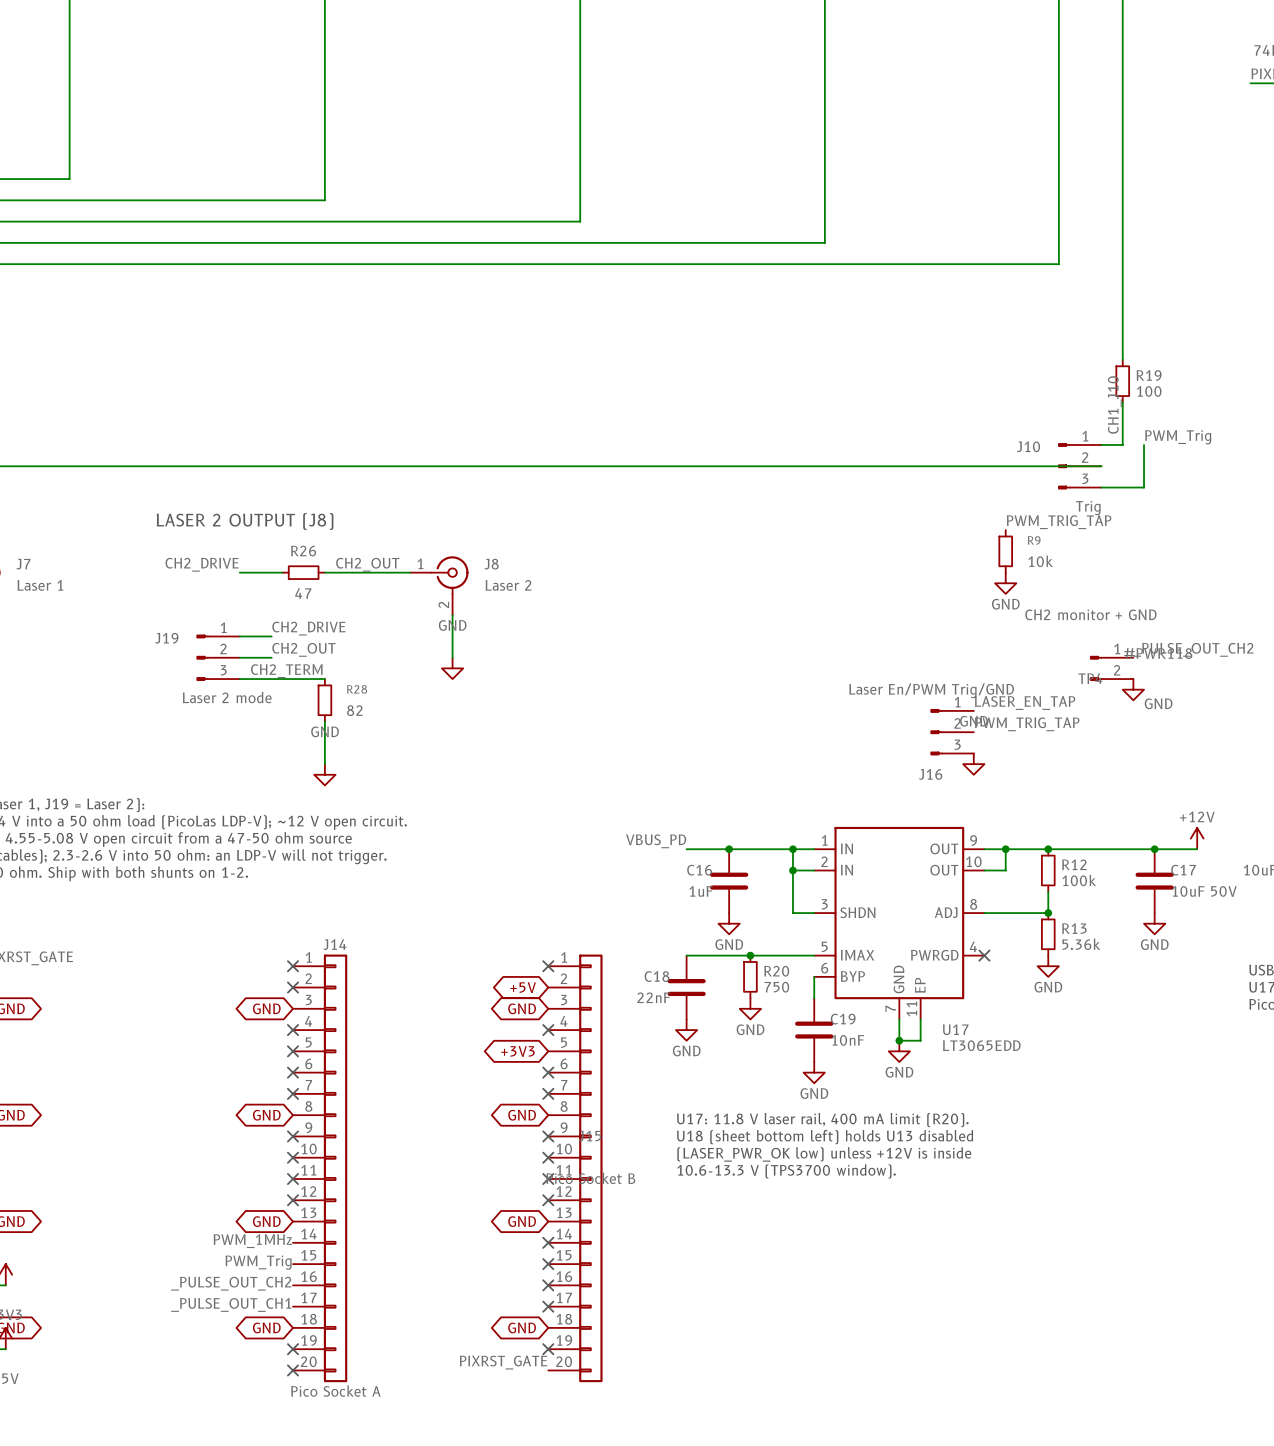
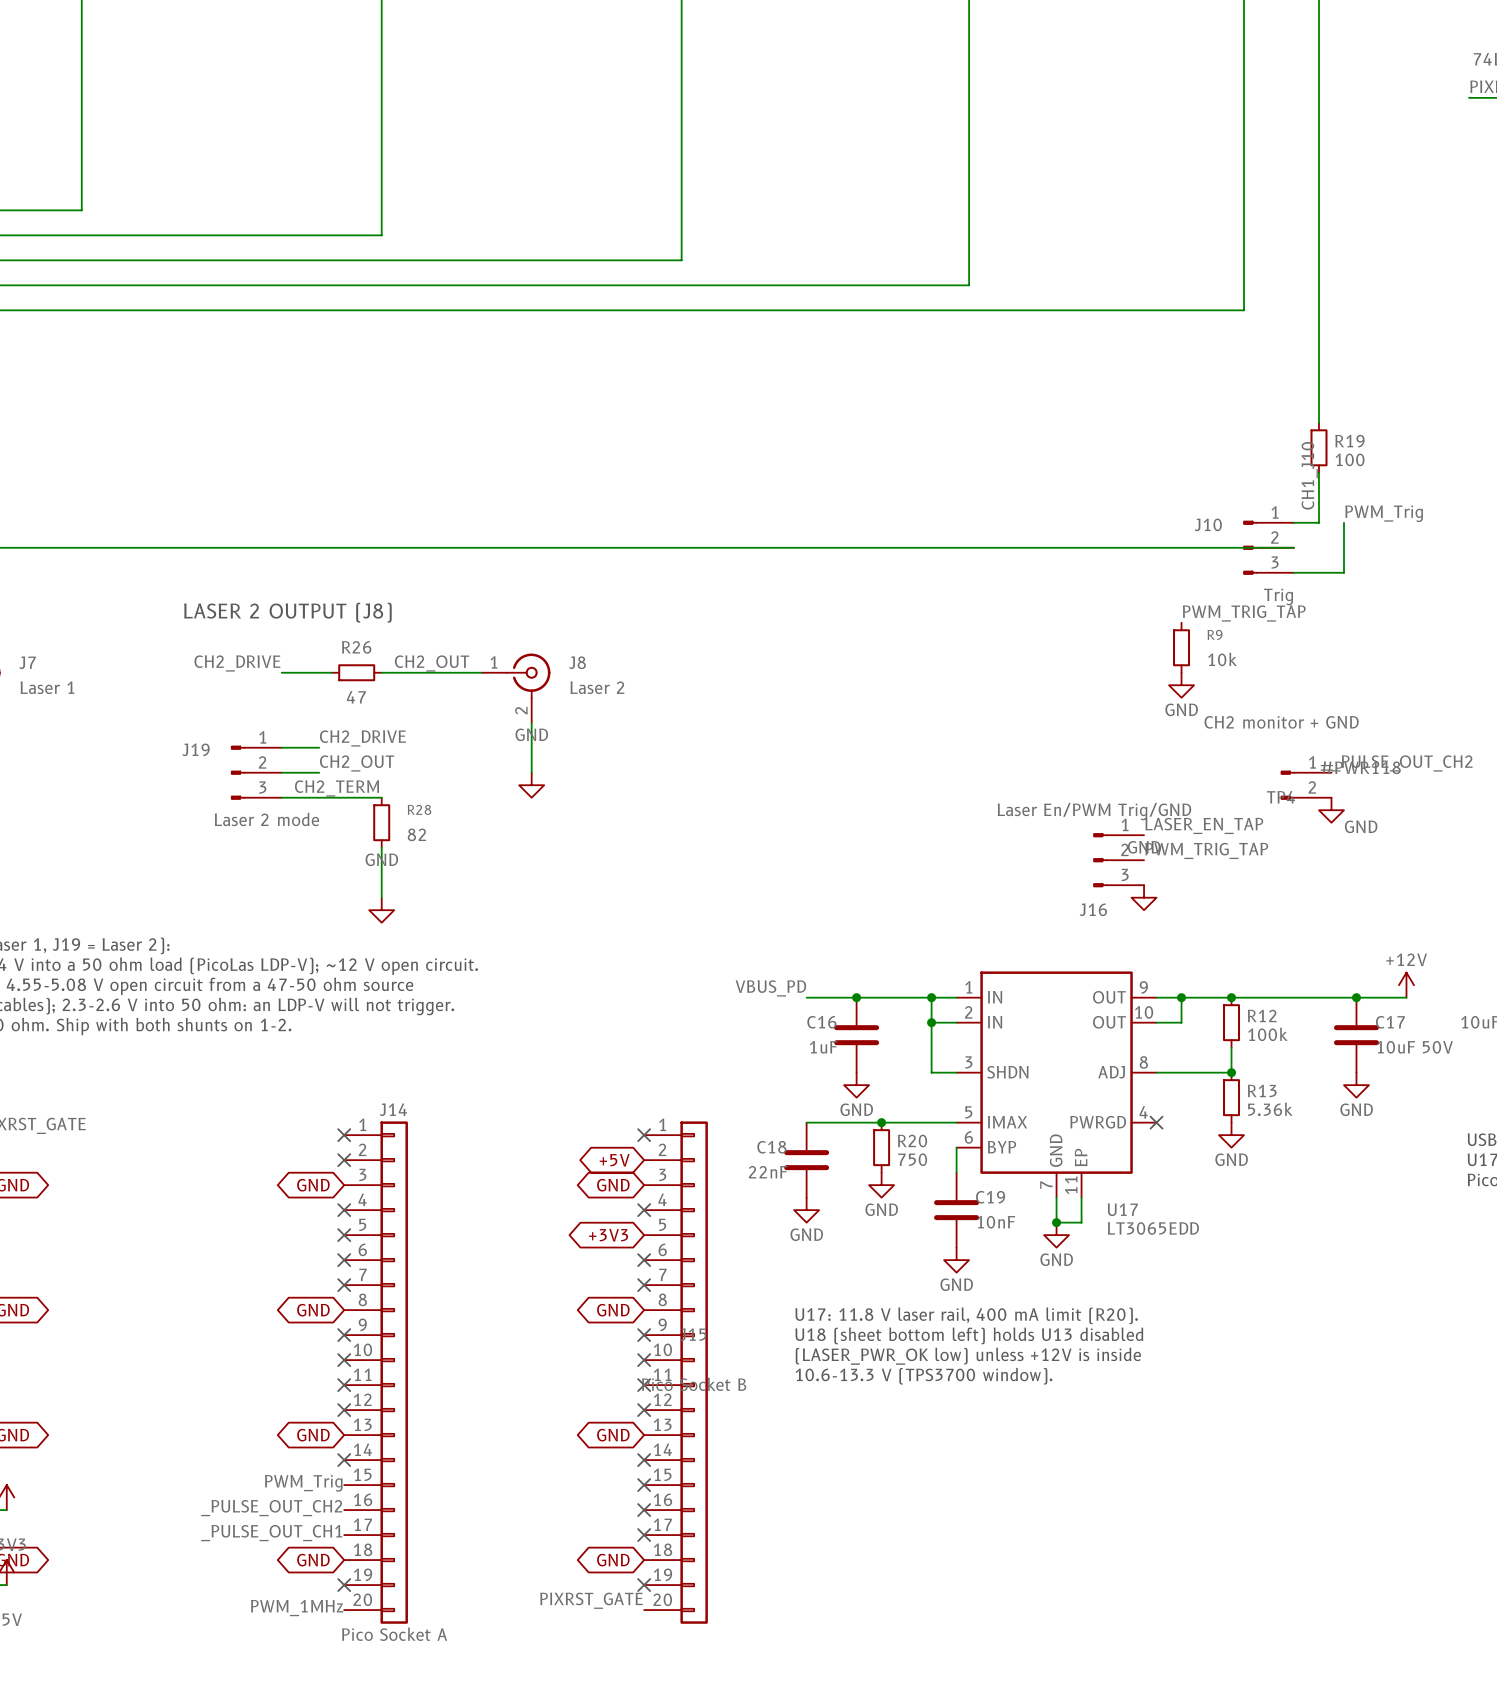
label position: PWM_1MHz (252, 1241) -> PWM_1MHz (297, 1608)
no-connect mark: none -> (344, 1460)
no-connect mark: (293, 1370) -> none

